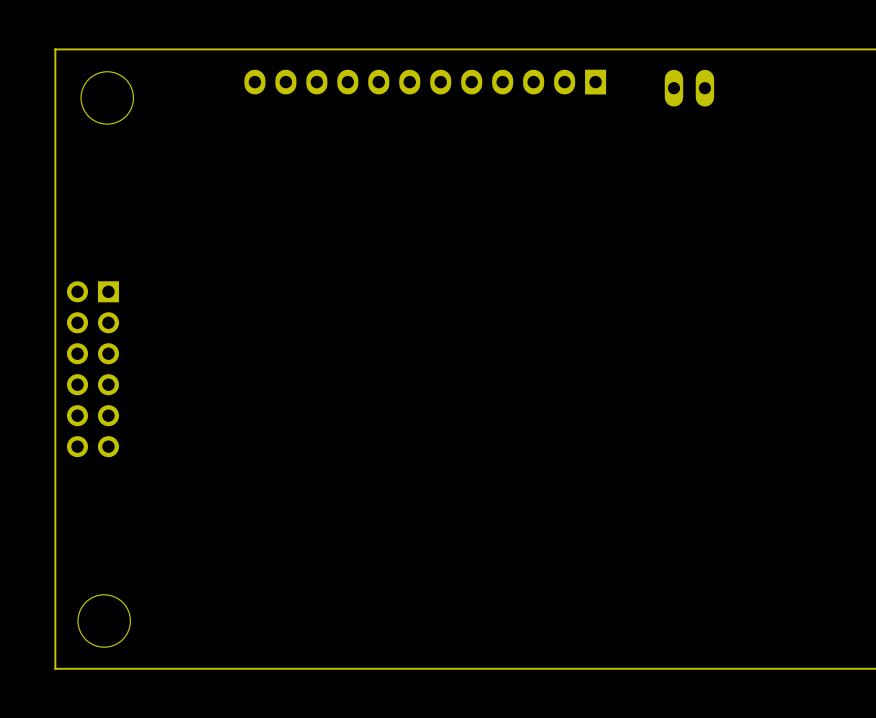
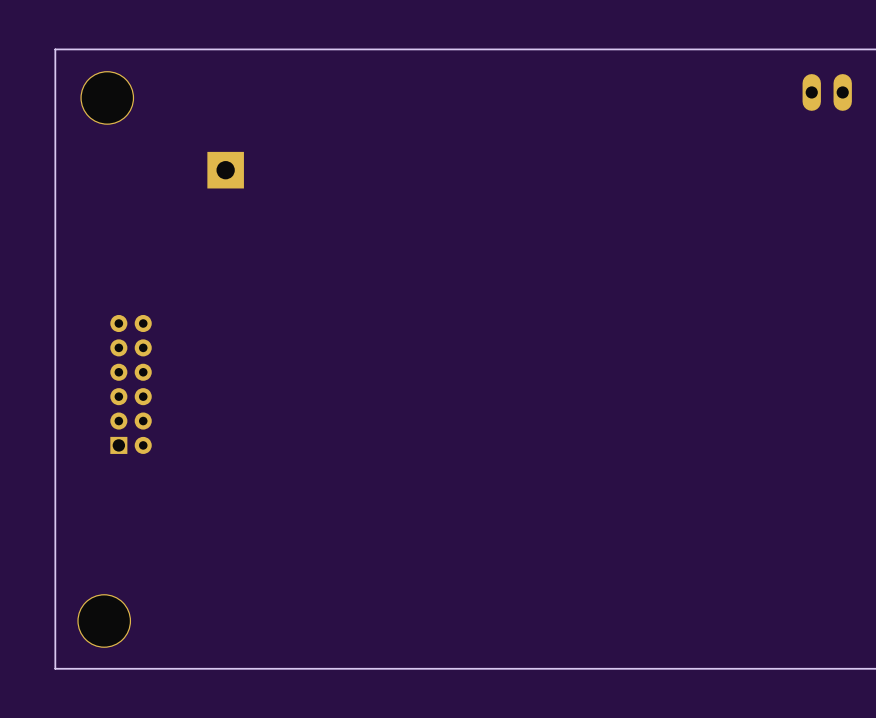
part: (425, 82) -> none
part position: (689, 88) -> (827, 92)
part: none -> (225, 170)
part: (93, 369) -> none
part: none -> (131, 384)

